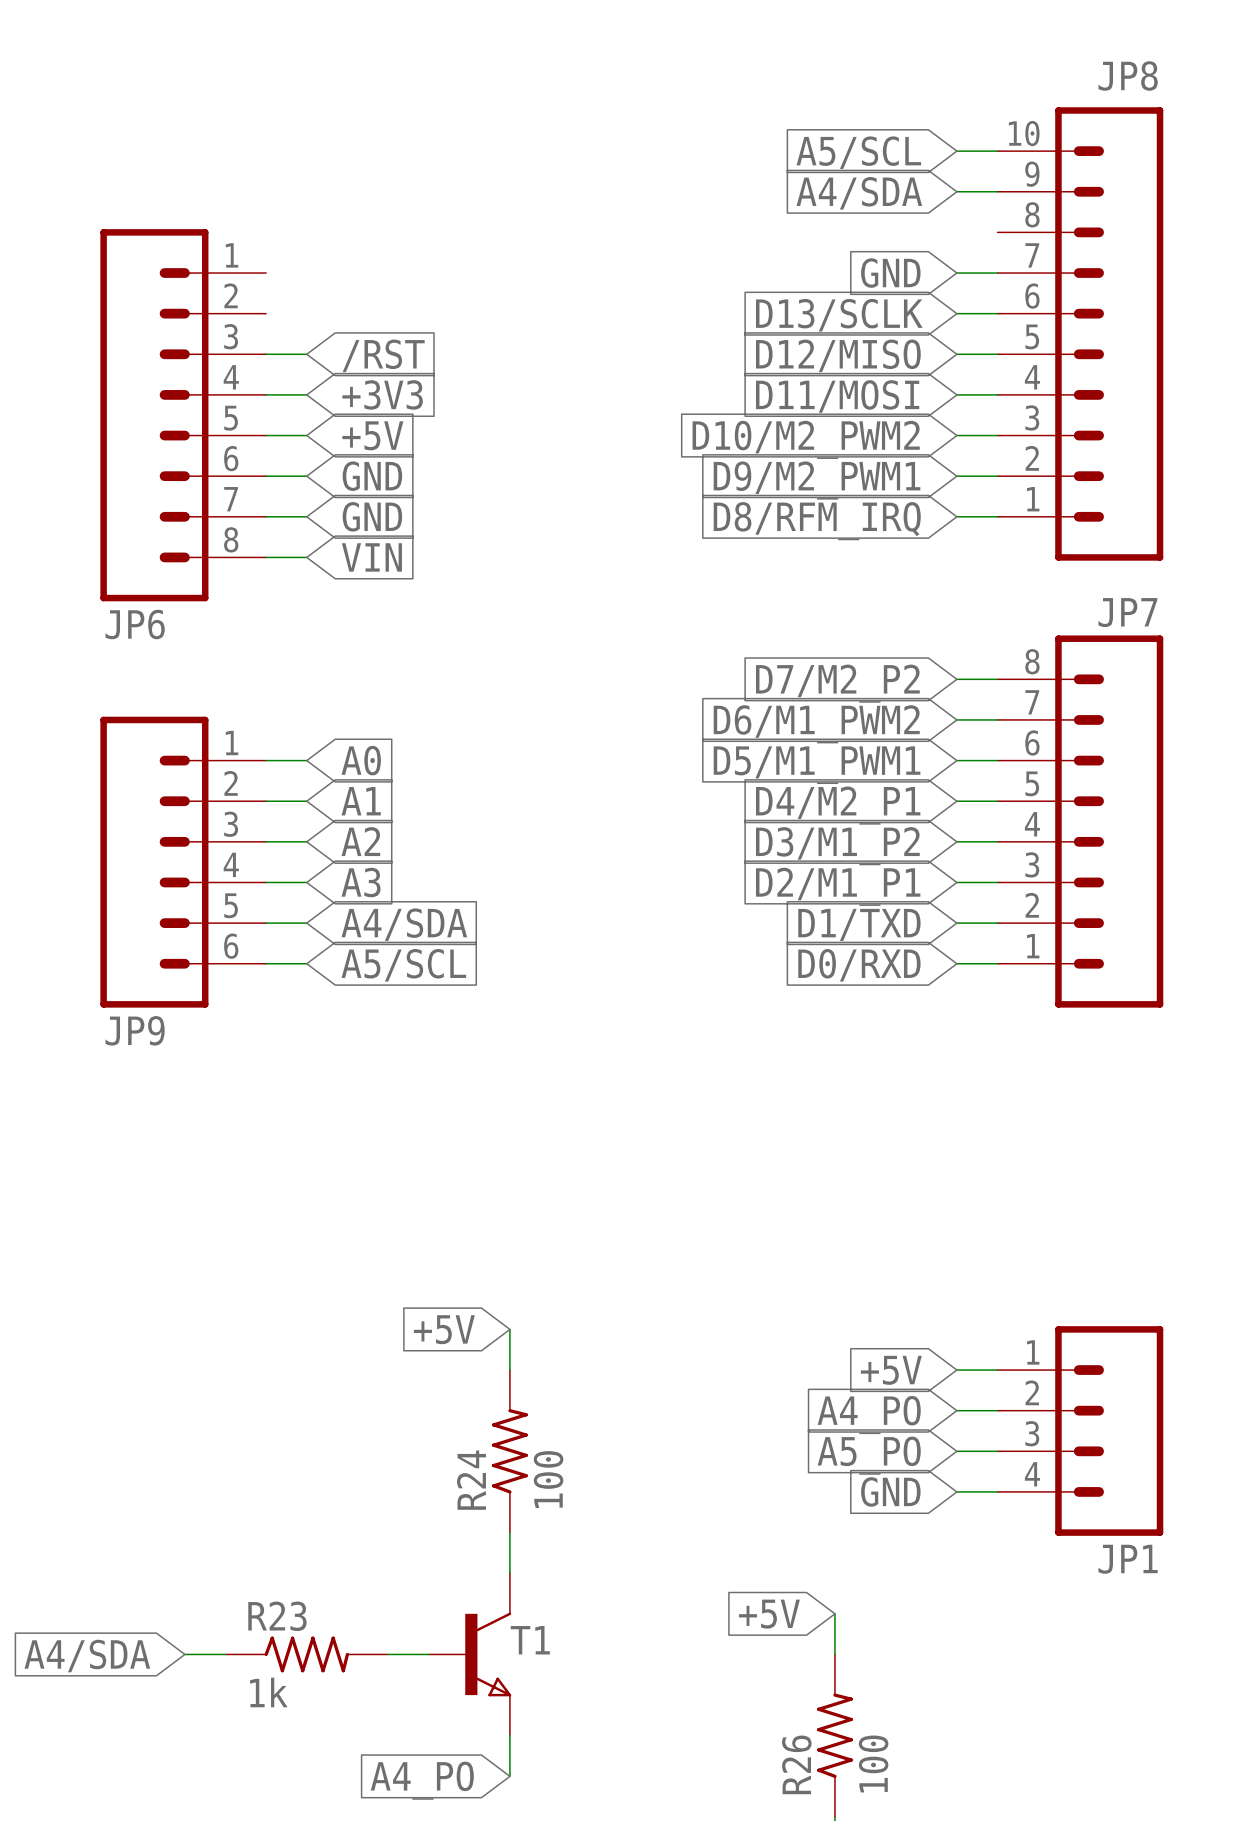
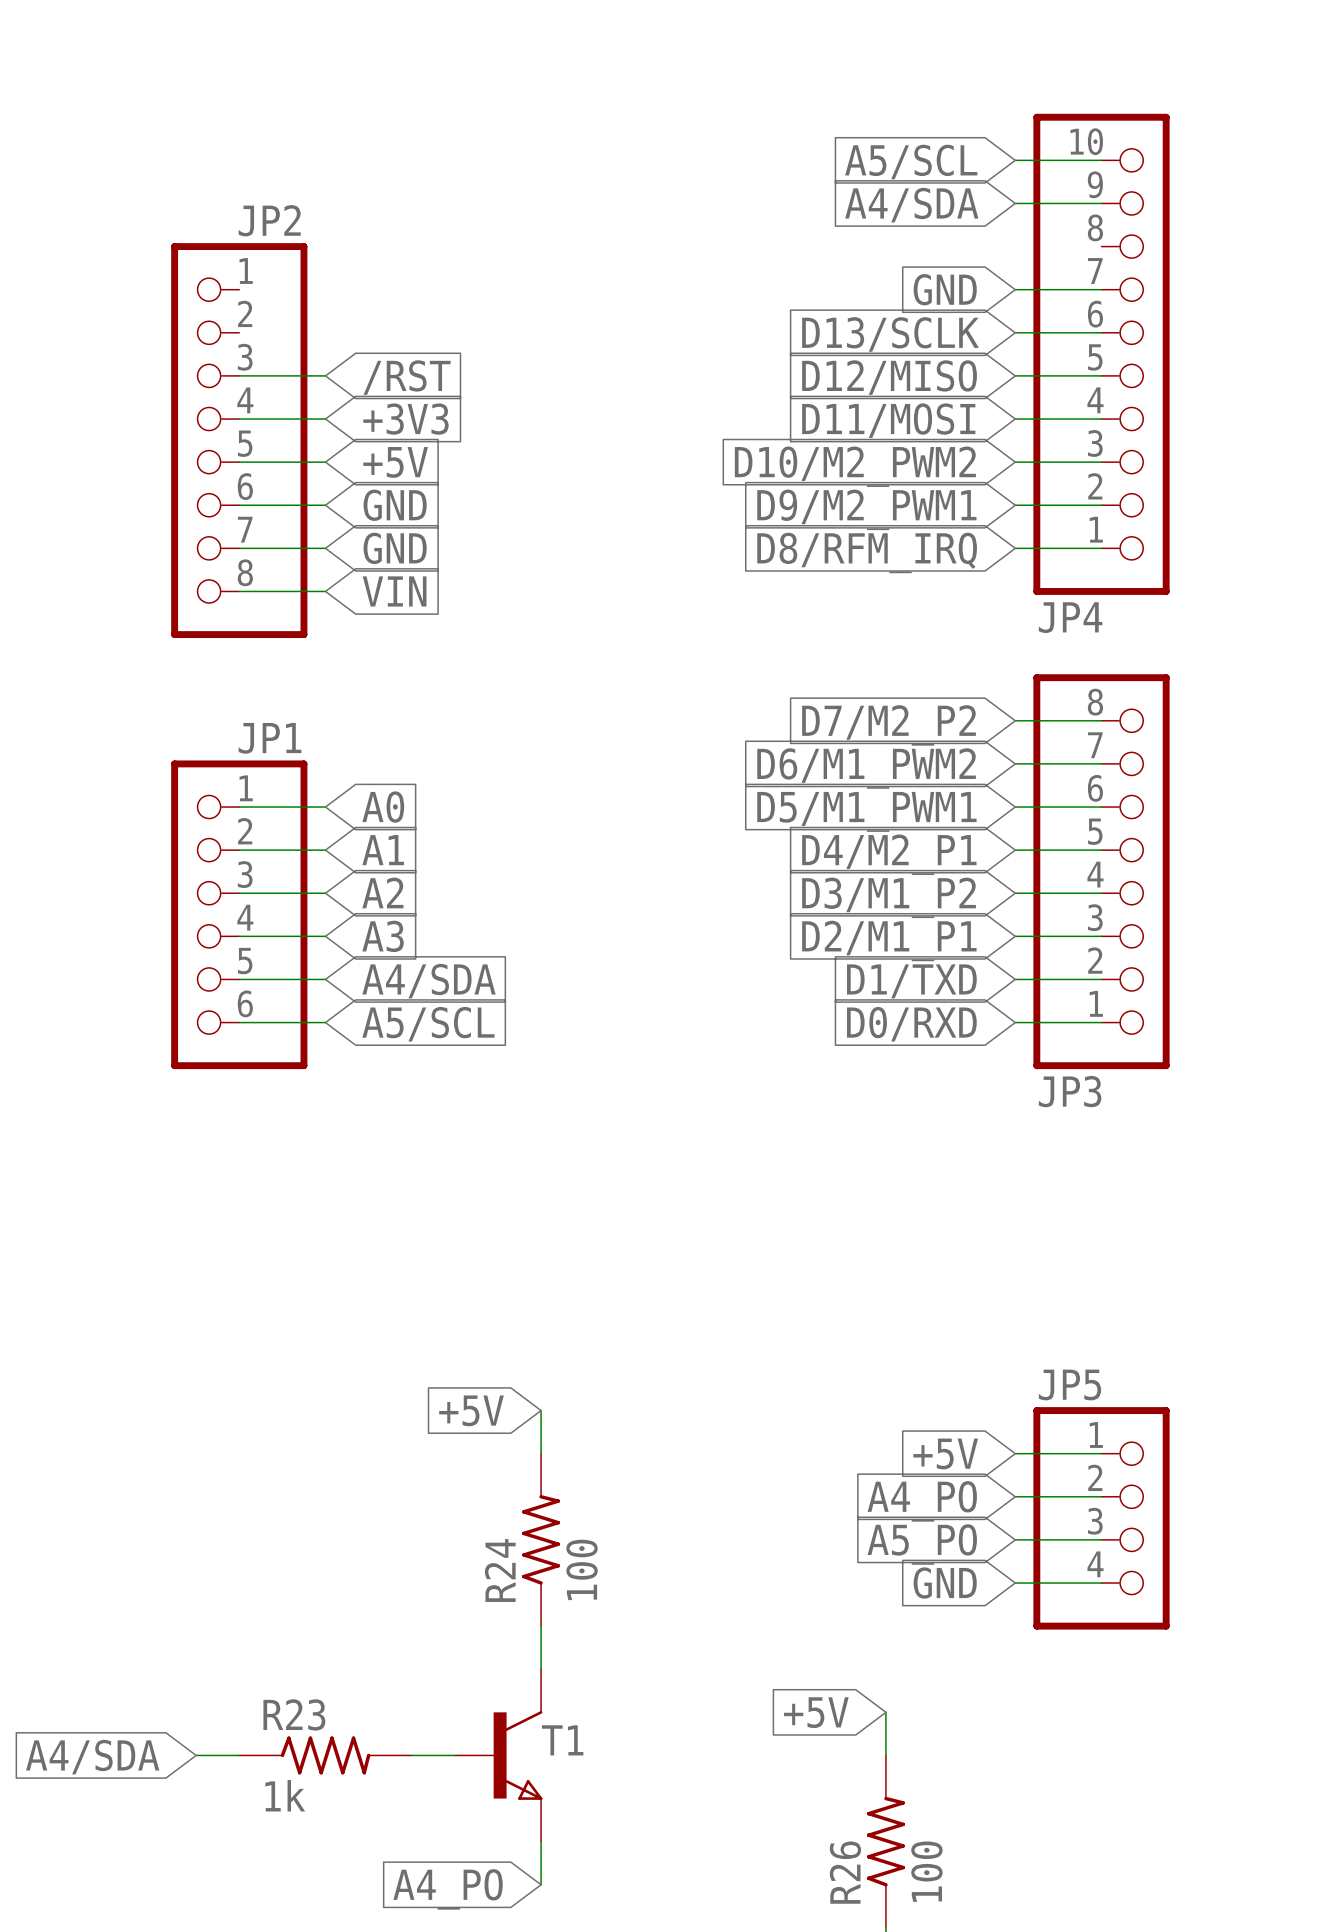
JP4: none -> (1101, 354)
JP8: (1080, 333) -> none
JP6: (183, 415) -> none
JP2: none -> (239, 440)
JP3: none -> (1101, 871)
JP7: (1080, 821) -> none
JP9: (183, 862) -> none
JP1 symbol: [997, 1326, 1164, 1536] -> [171, 760, 308, 1070]
JP5: none -> (1101, 1518)
JP1 name position: JP1 (1128, 1559) -> JP1 (270, 738)

